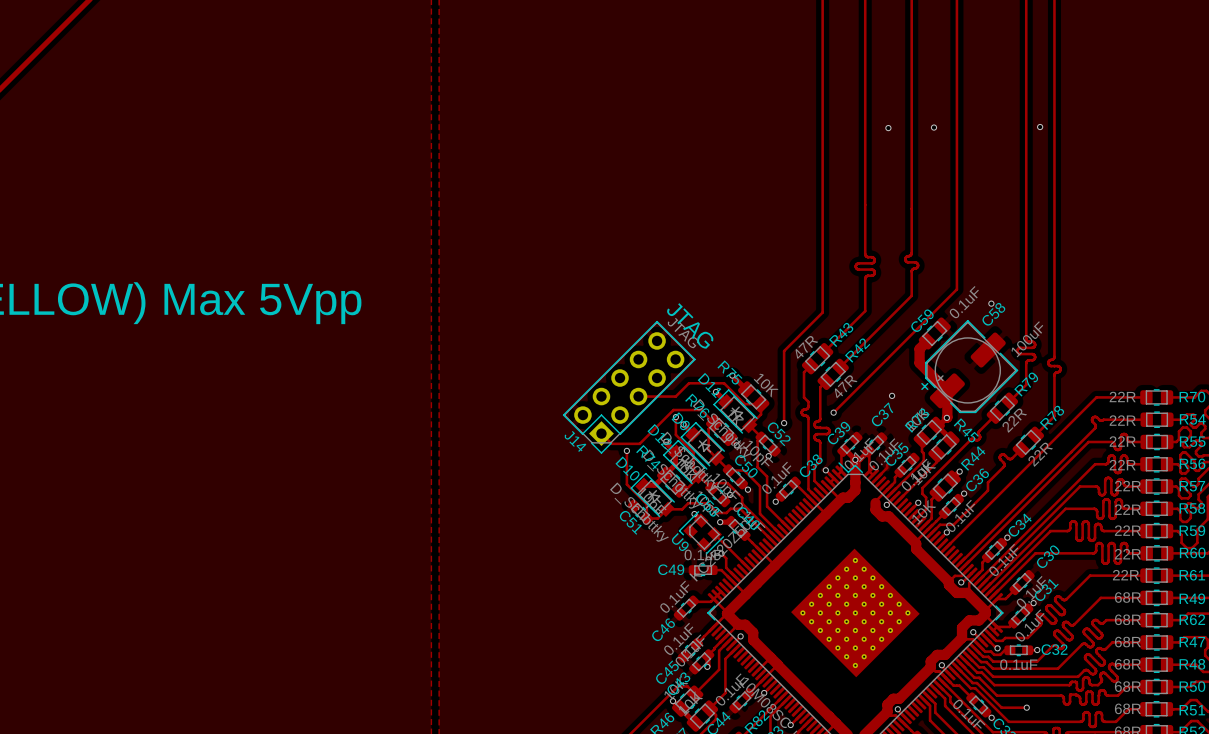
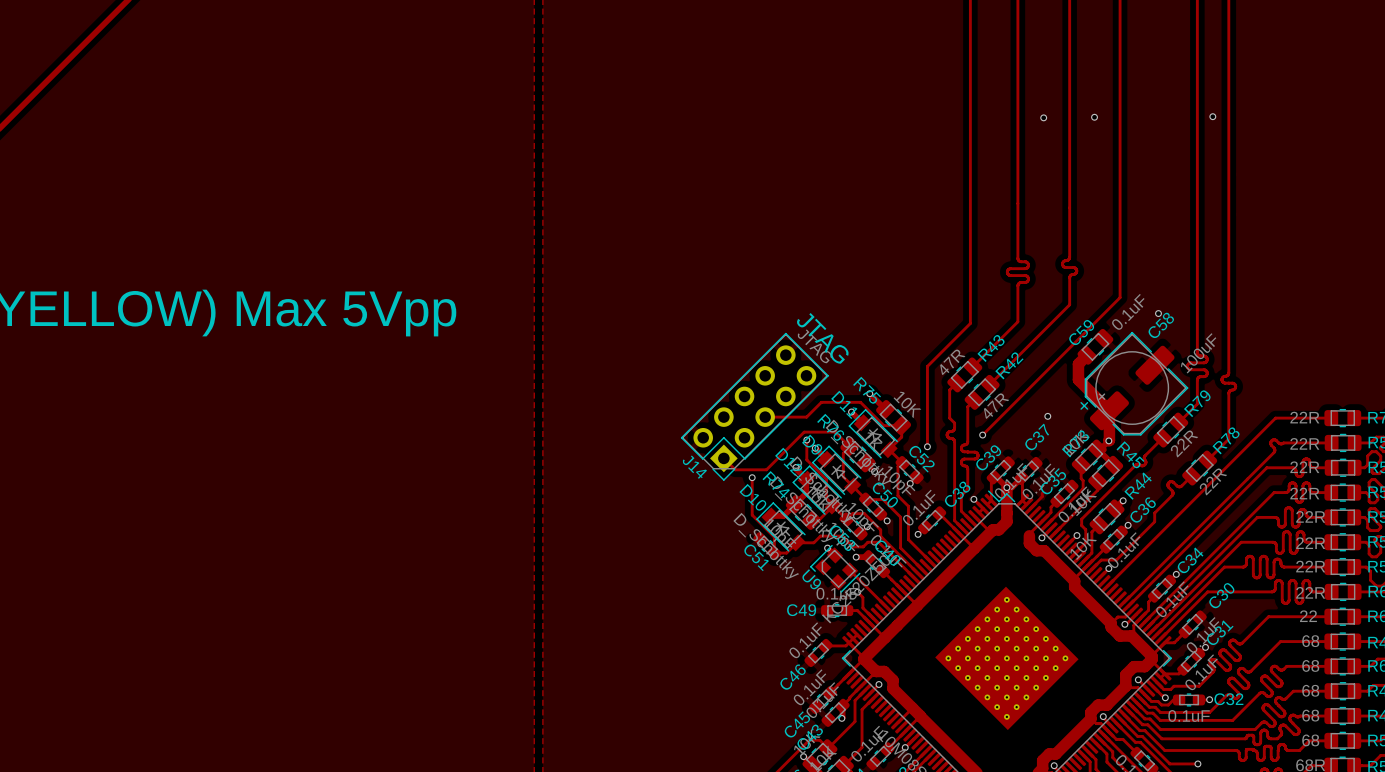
R61 value: 22R (1125, 575) -> 22 (1308, 616)
R49 value: 68R (1127, 597) -> 68 (1310, 641)
R62 value: 68R (1127, 619) -> 68 (1310, 665)
R47 value: 68R (1127, 642) -> 68 (1310, 690)
R48 value: 68R (1127, 664) -> 68 (1310, 715)
R50 value: 68R (1127, 686) -> 68 (1310, 740)

